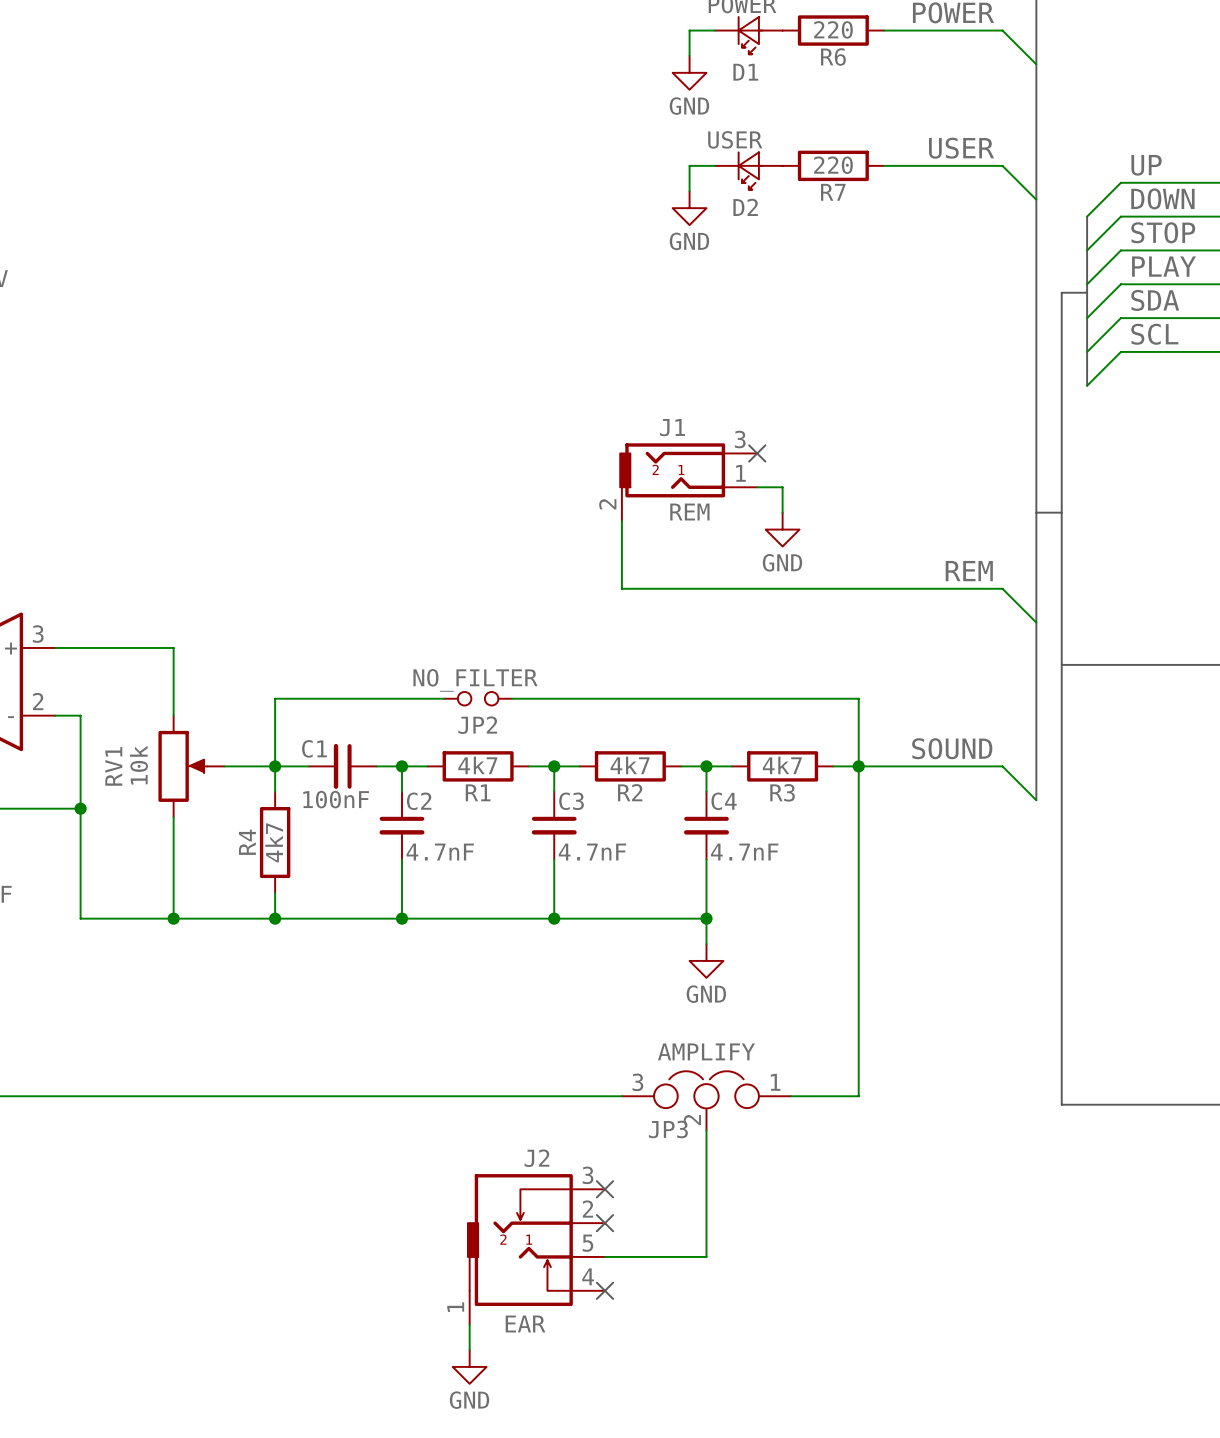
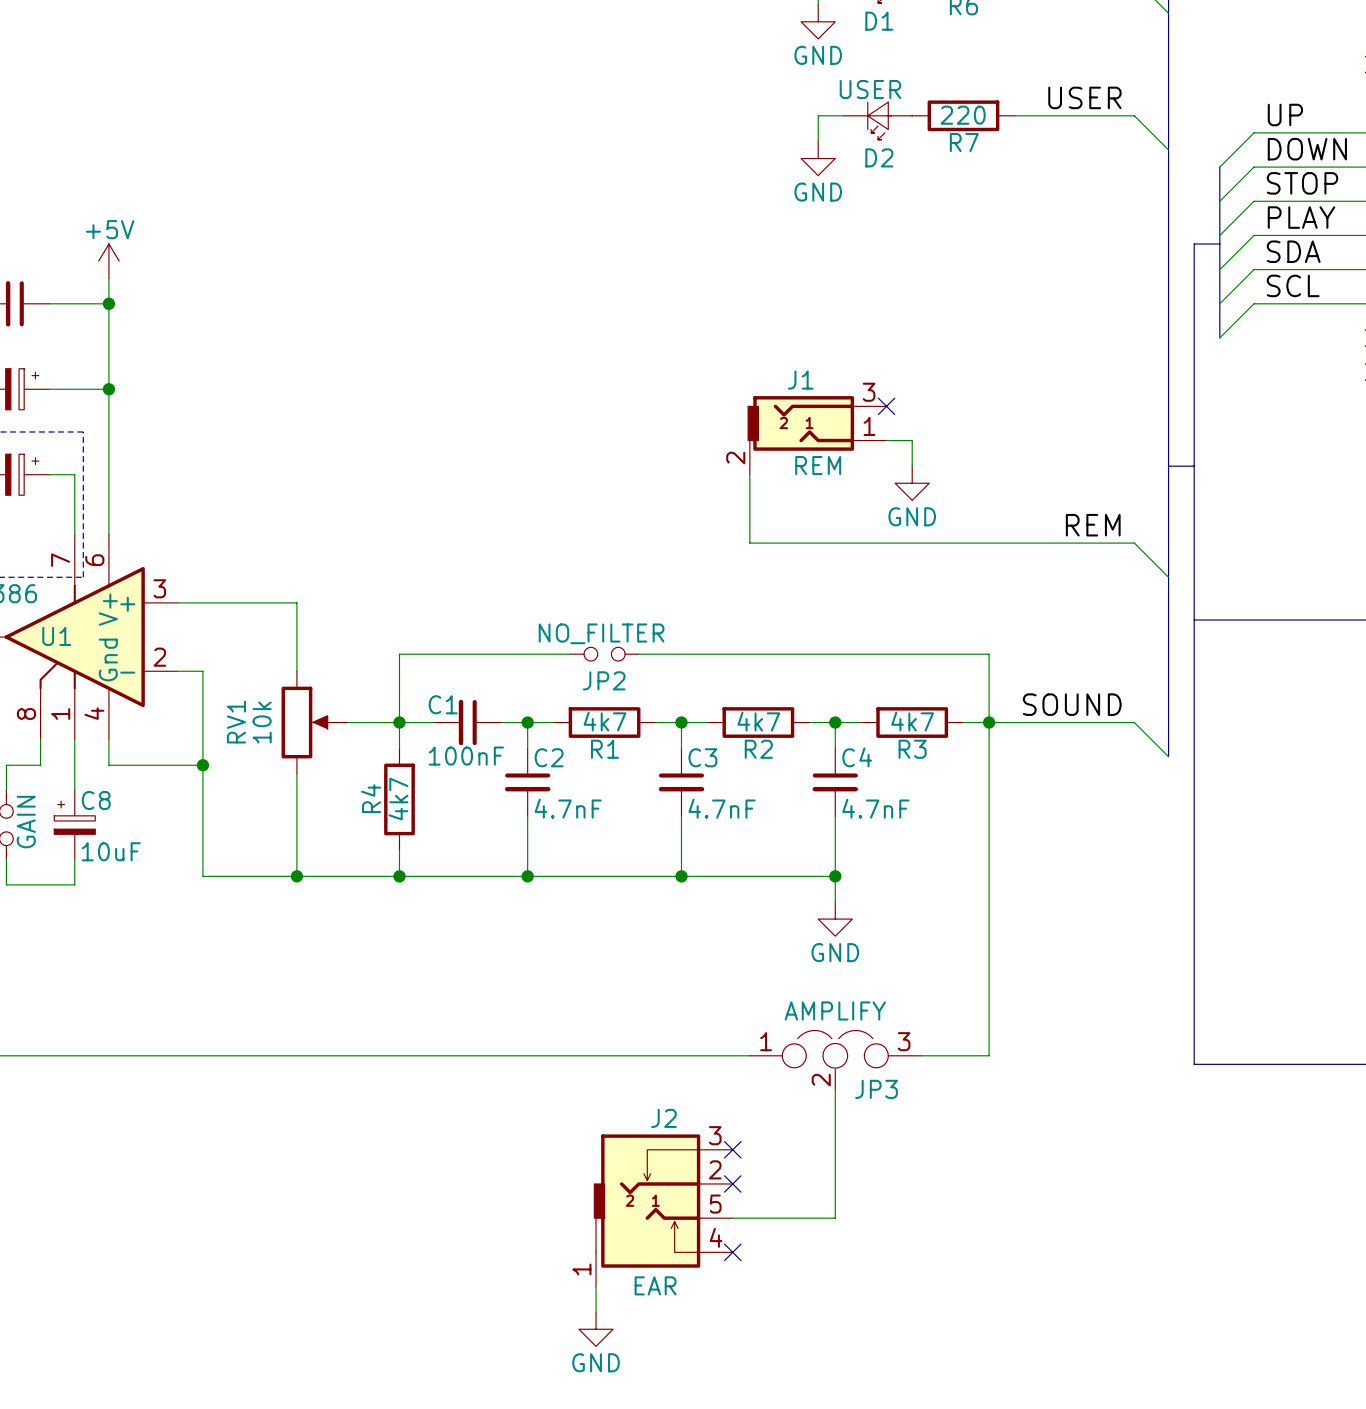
JP3 flip: as is (706, 1089) -> left-right (835, 1049)

